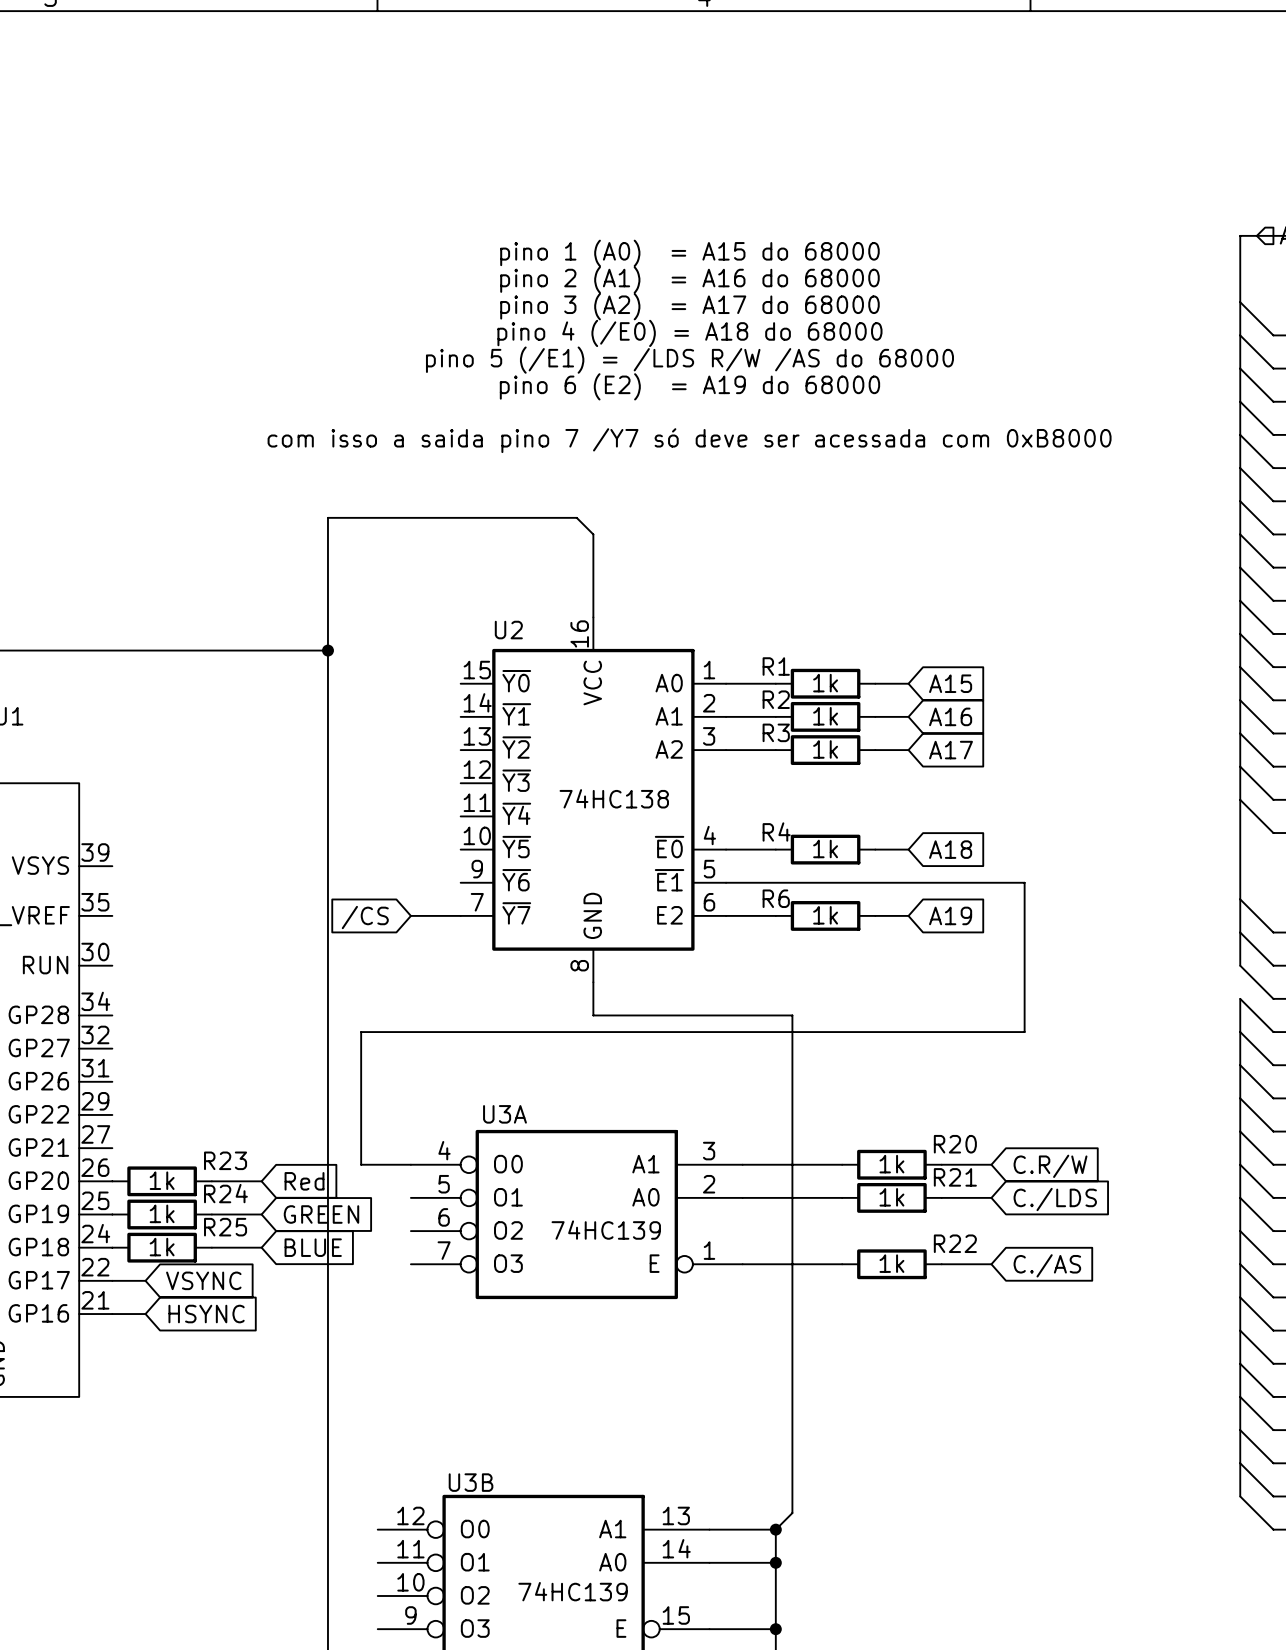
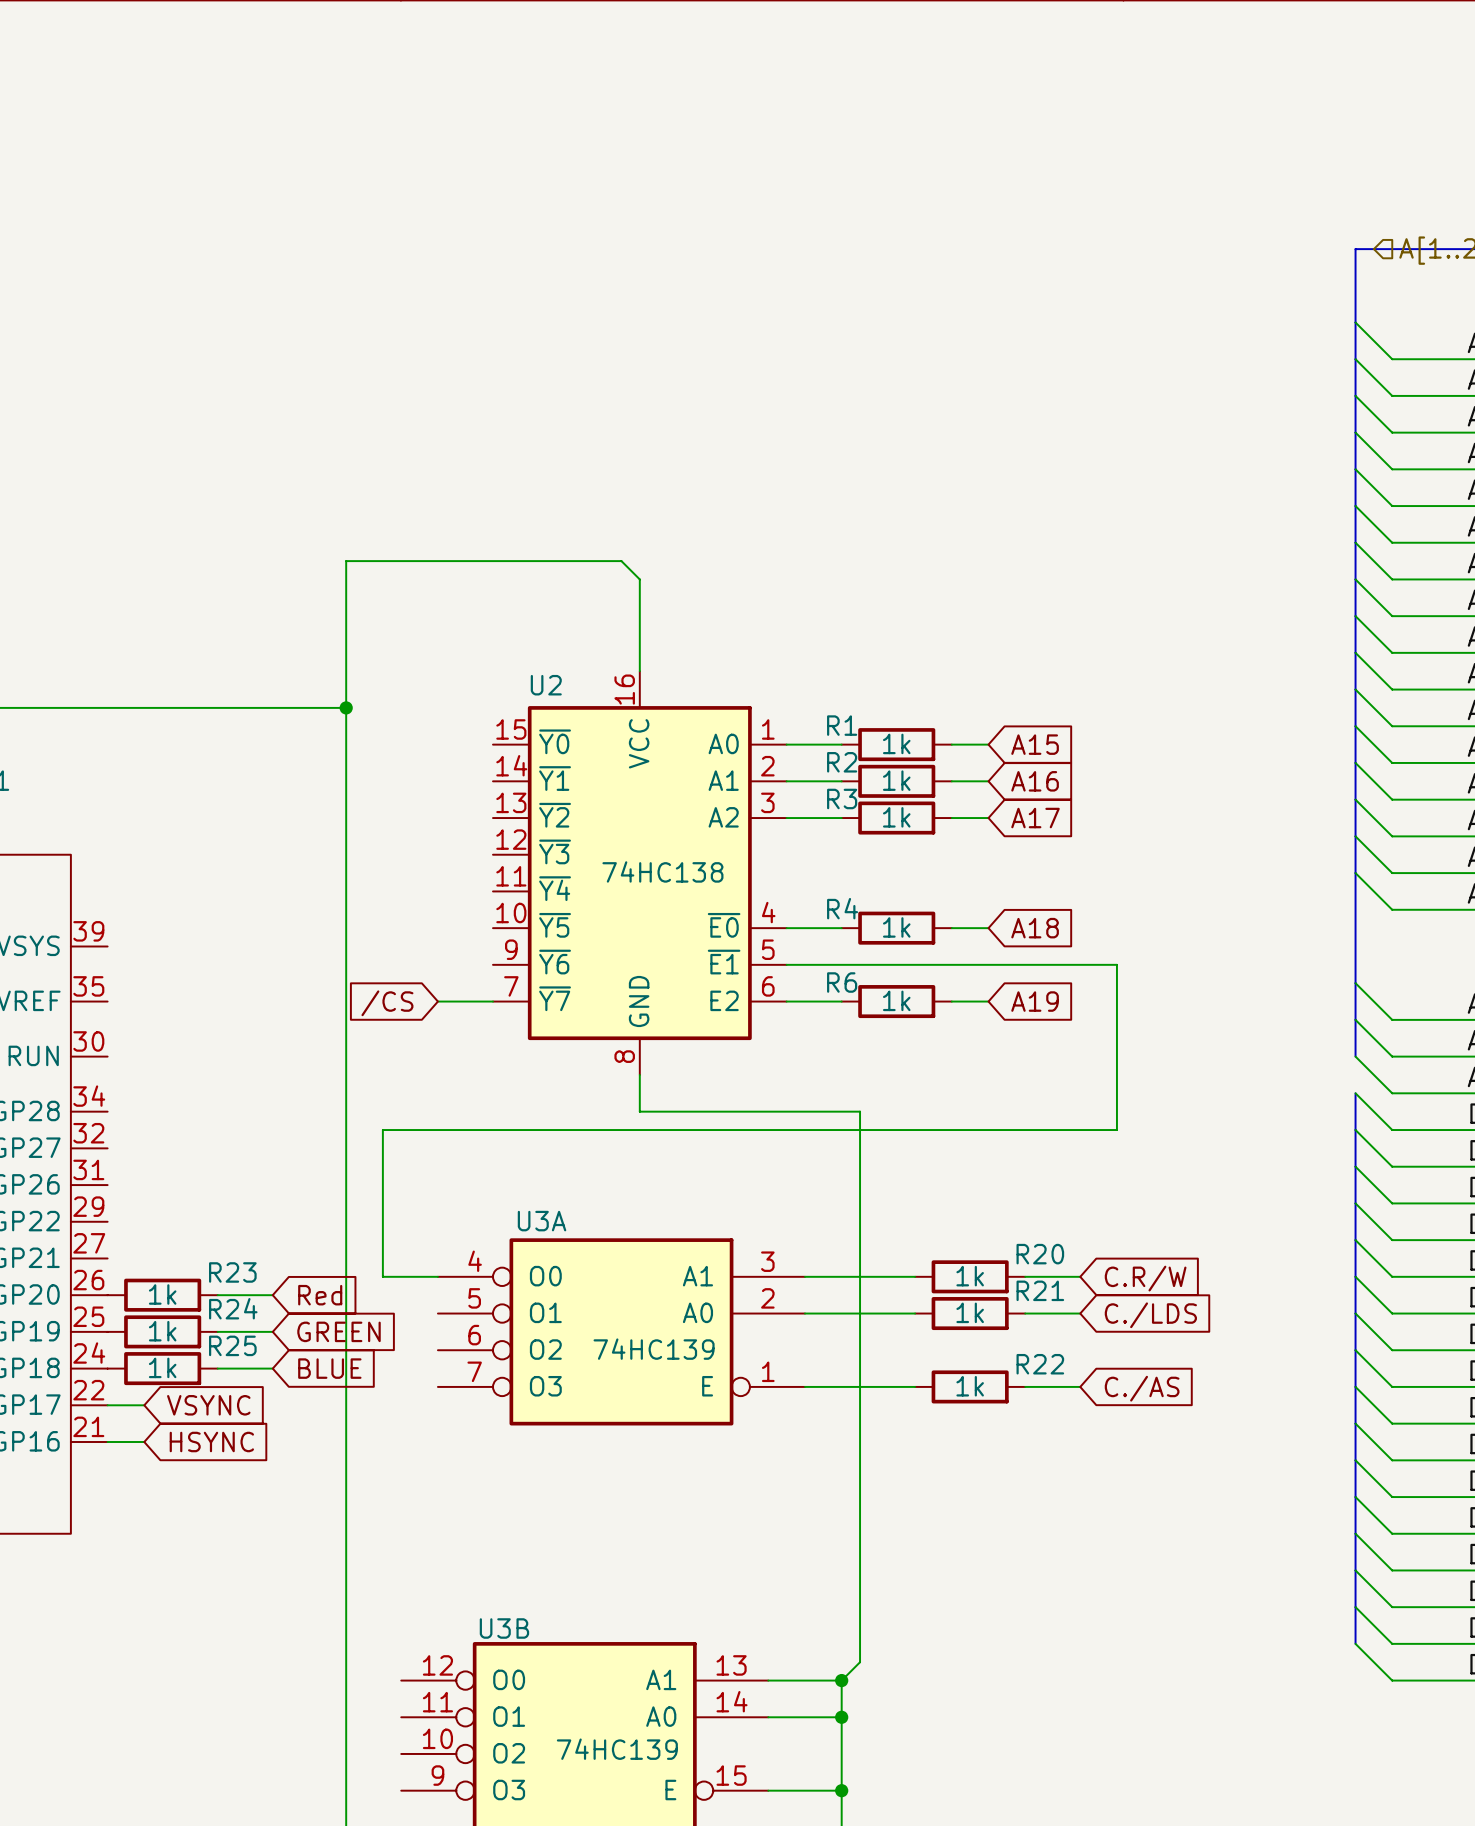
text: pino 1 (A0) = A15 do 68000 (689, 253) -> none
text: pino 2 (A1) = A16 do 68000 (689, 280) -> none
text: pino 3 (A2) = A17 do 68000 (689, 306) -> none
text: pino 4 (/E0) = A18 do 68000 (689, 333) -> none
text: pino 5 (/E1) = /LDS R/W /AS do 68000 (689, 360) -> none
text: pino 6 (E2) = A19 do 68000 (689, 386) -> none
text: com isso a saida pino 7 /Y7 só deve ser acessada com 0xB8000 (689, 440) -> none

